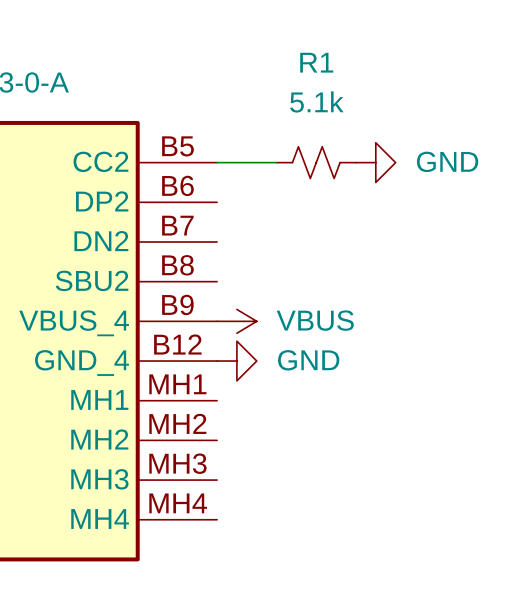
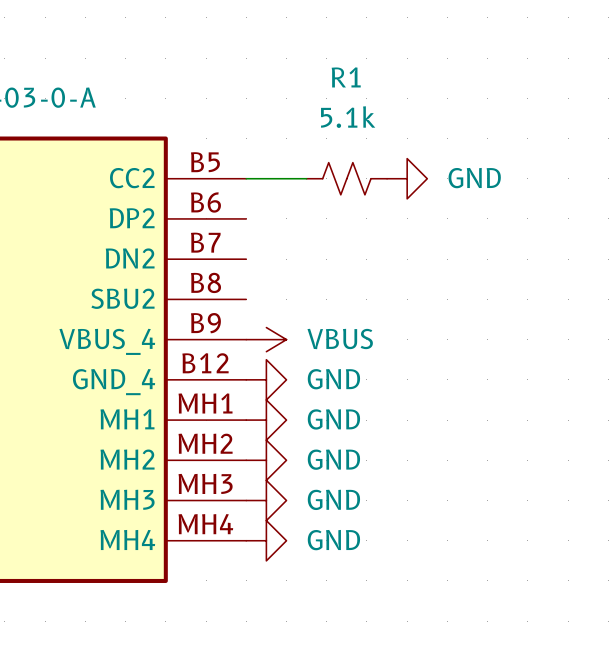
power symbol: none -> GND (266, 420)
power symbol: none -> GND (266, 460)
power symbol: none -> GND (266, 500)
power symbol: none -> GND (266, 540)

